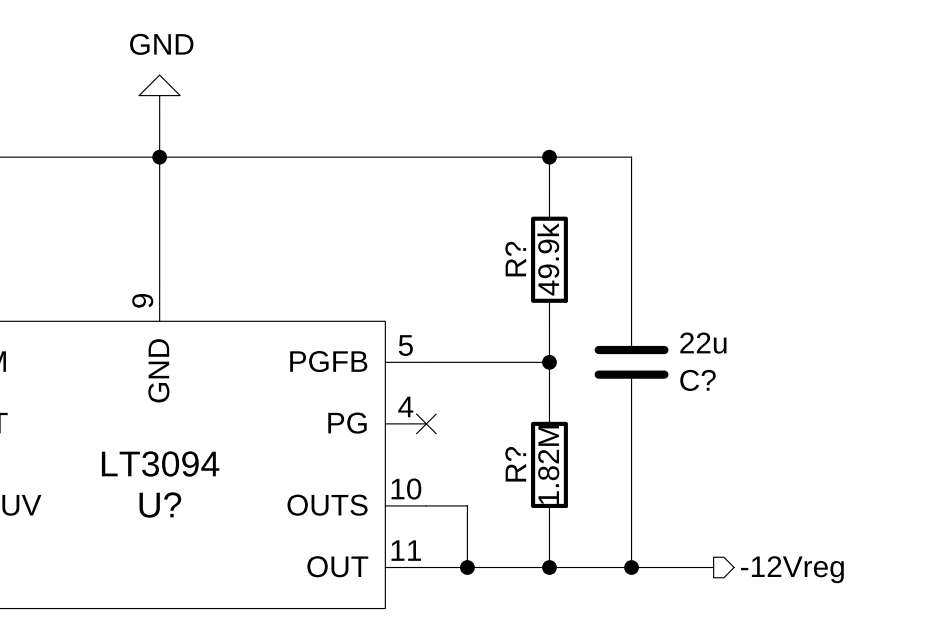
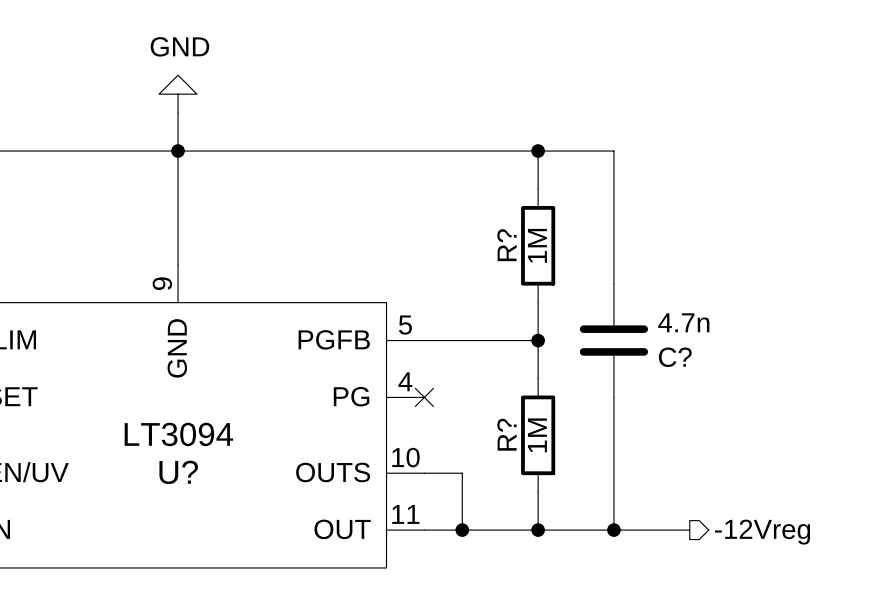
R? value: 49.9k (548, 259) -> 1M (537, 245)
C? value: 22u (703, 343) -> 4.7n (683, 322)
R? value: 1.82M (548, 465) -> 1M (537, 435)

